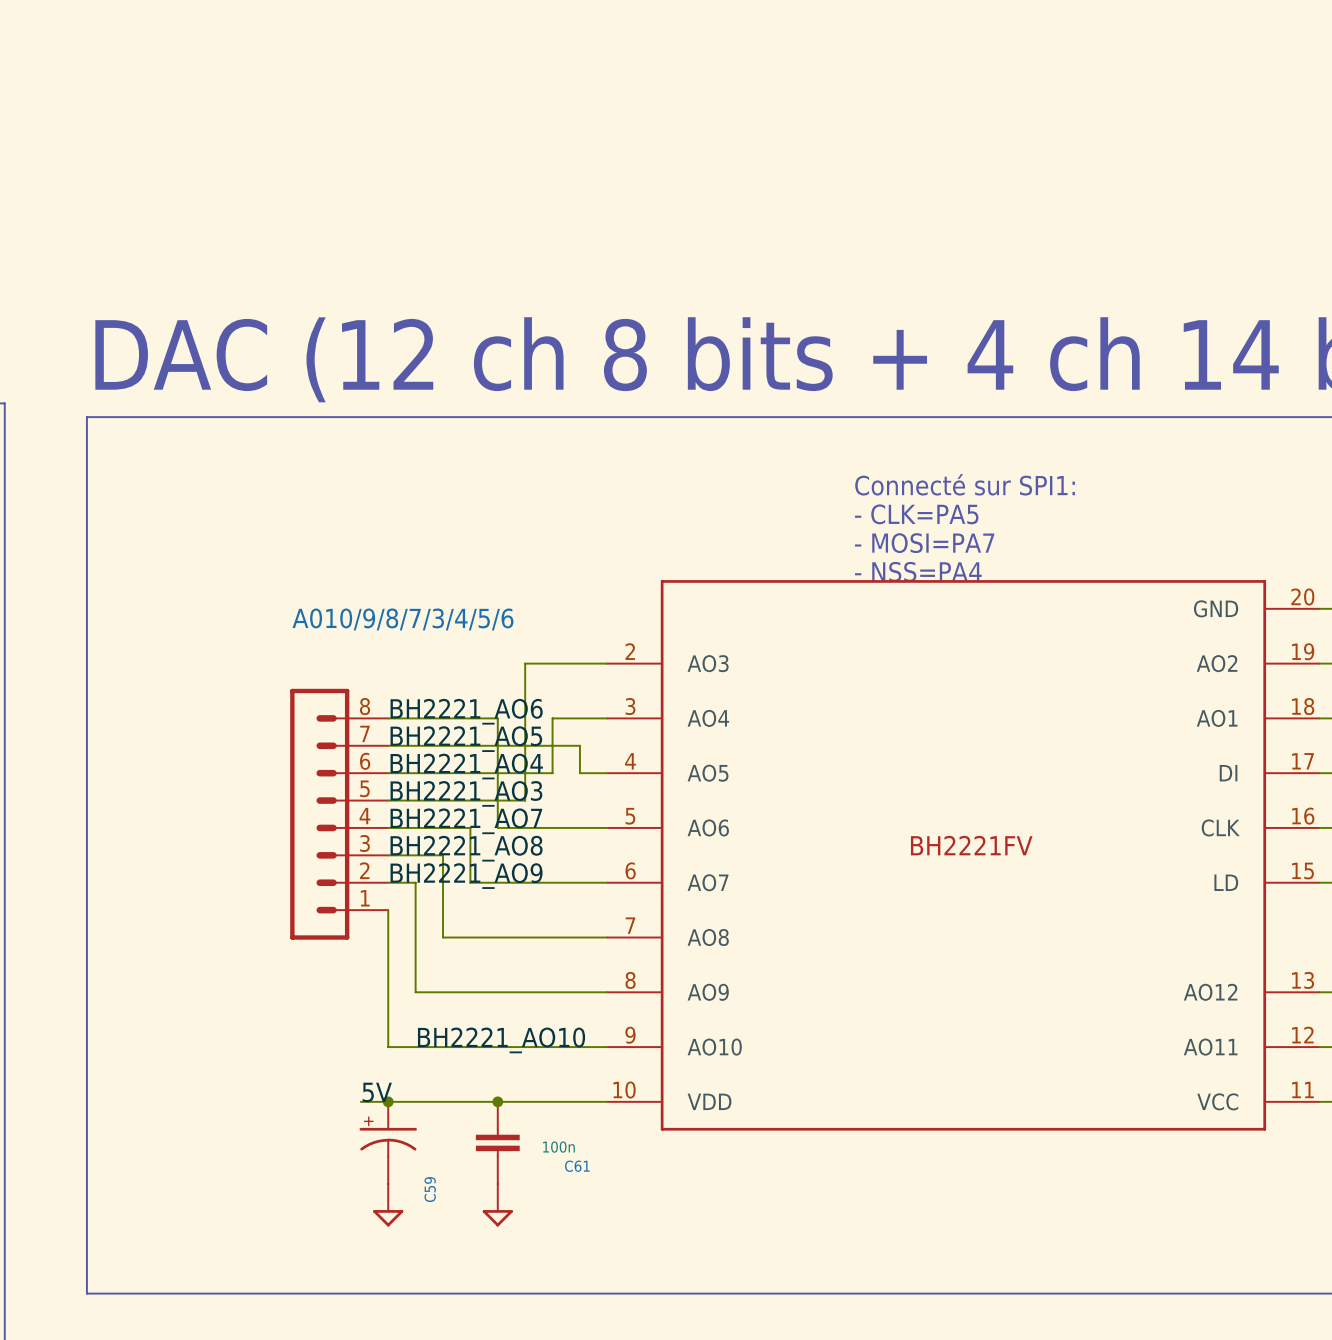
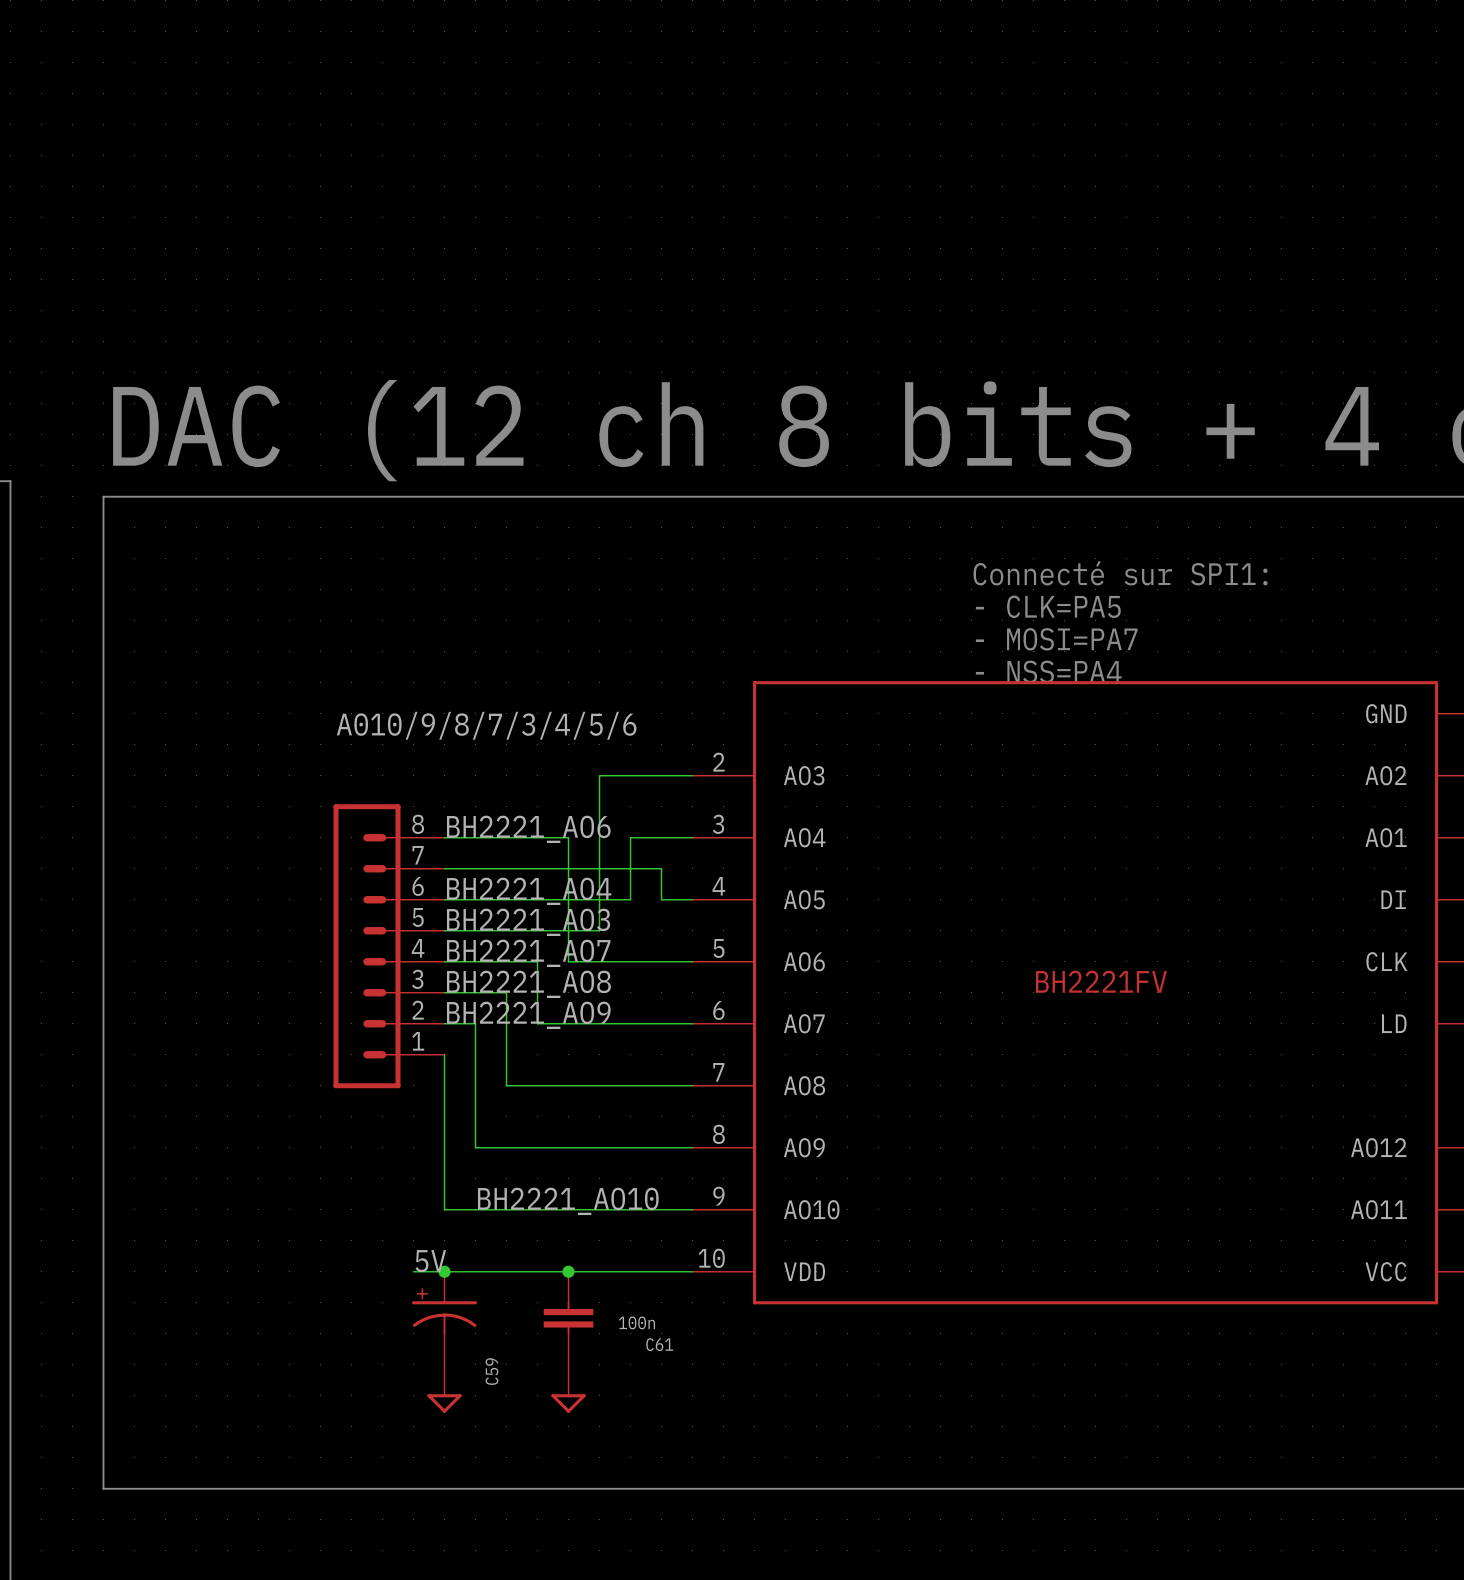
label: BH2221_AO5 (466, 739) -> none

